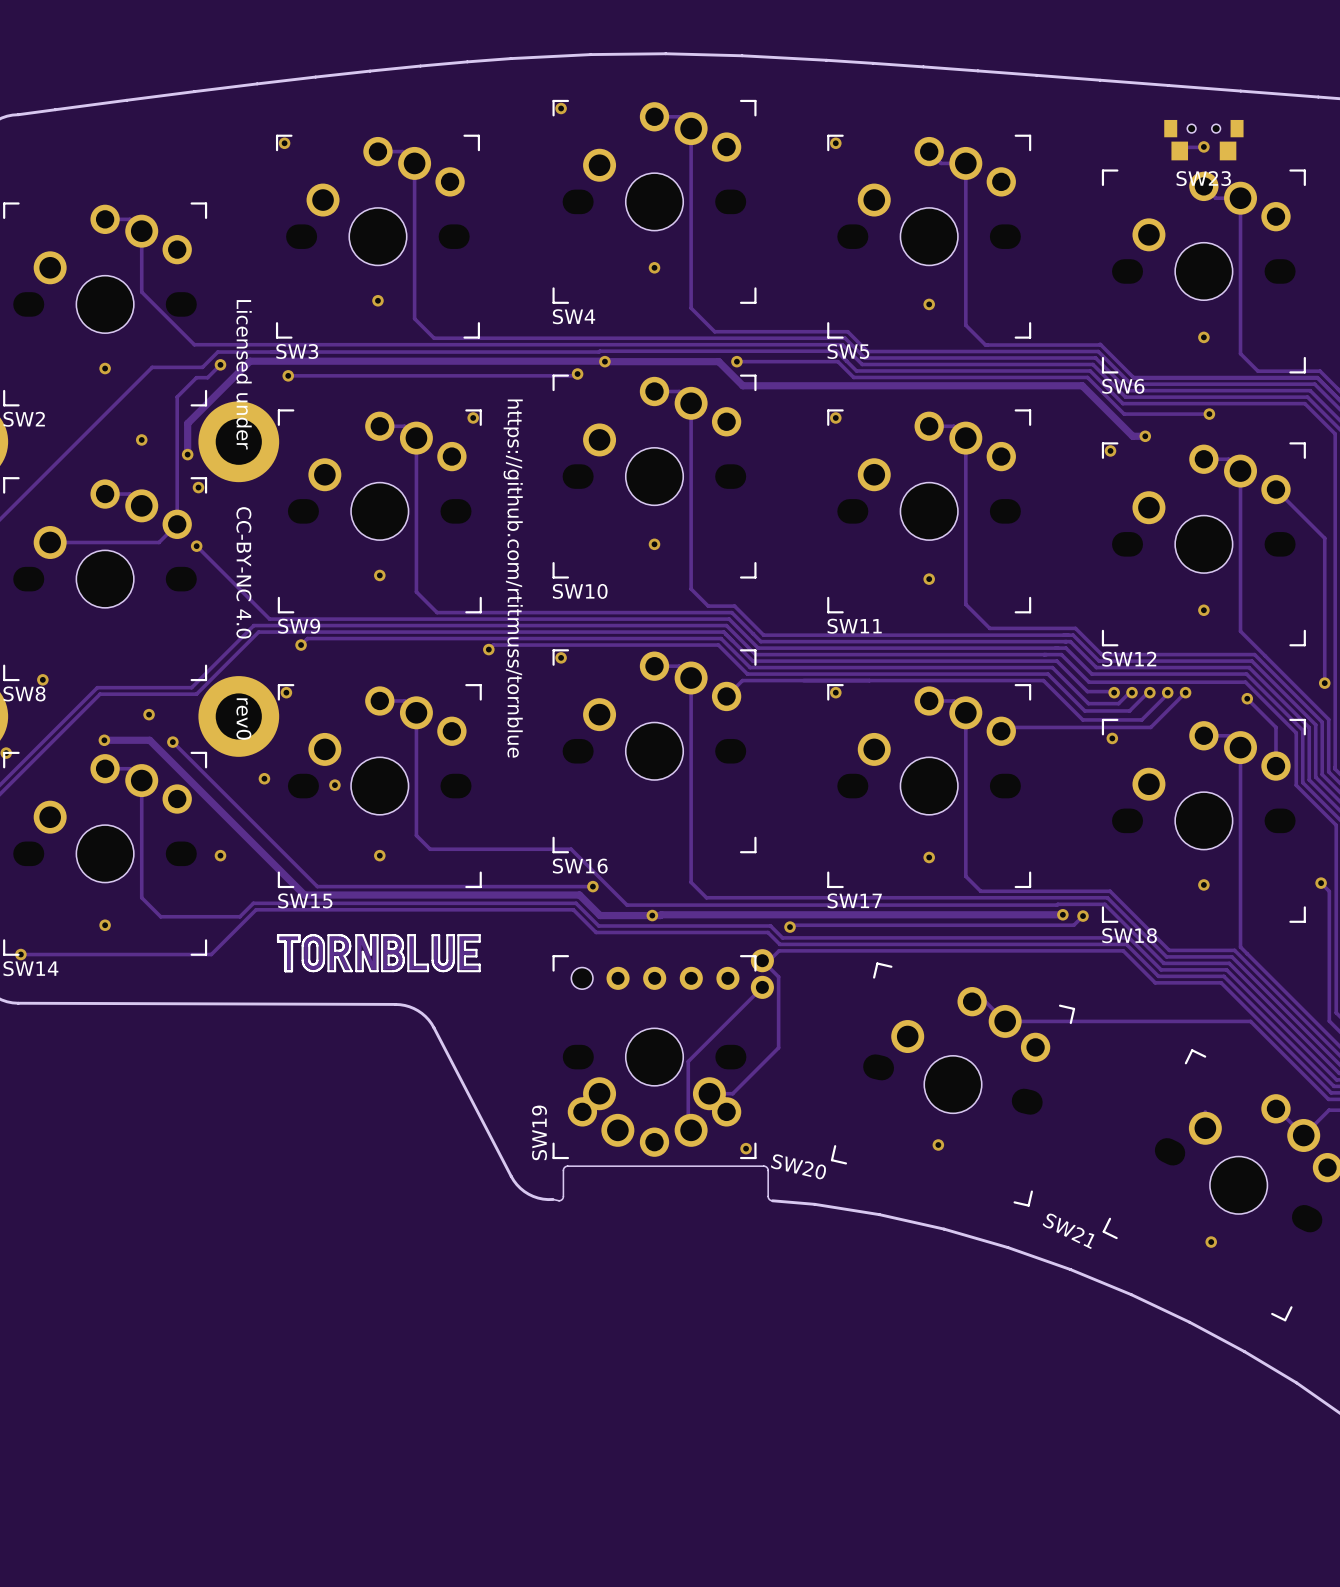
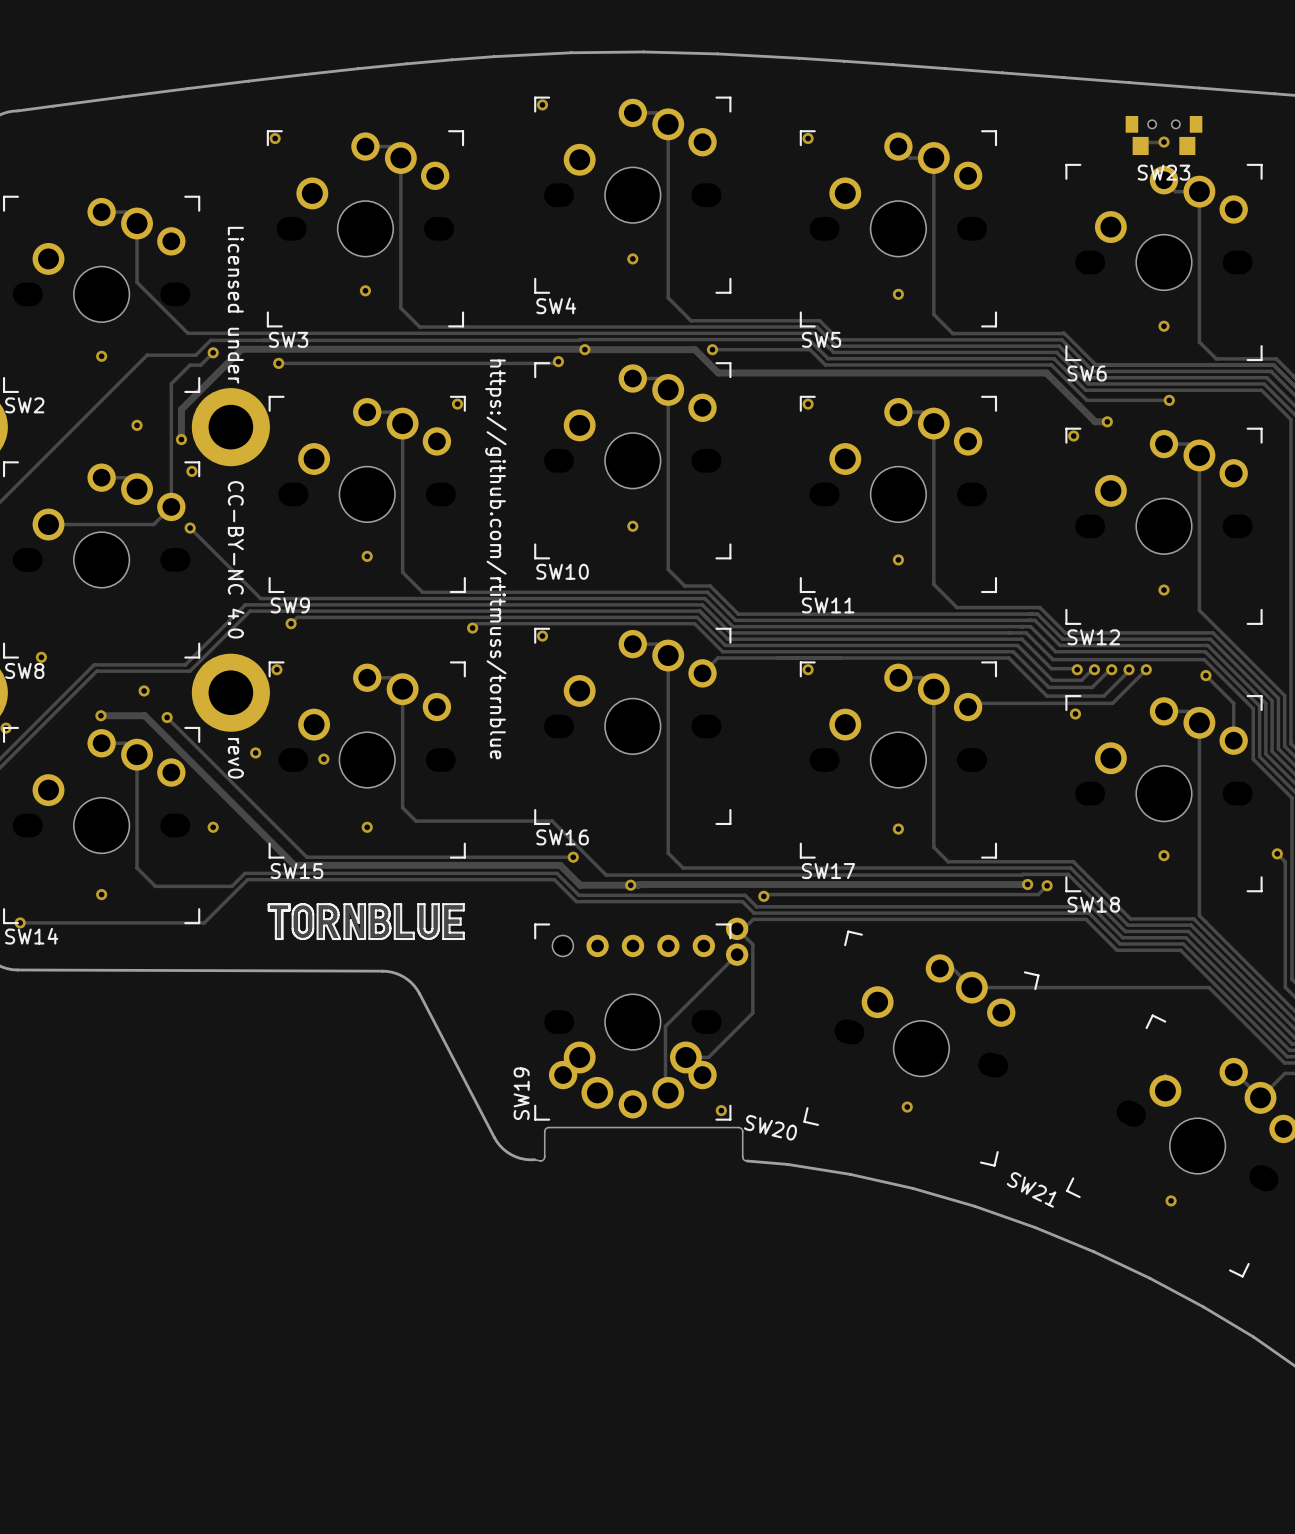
track: (1275, 489) (1324, 538) (1324, 683) -> none
via: (1324, 683) -> none

